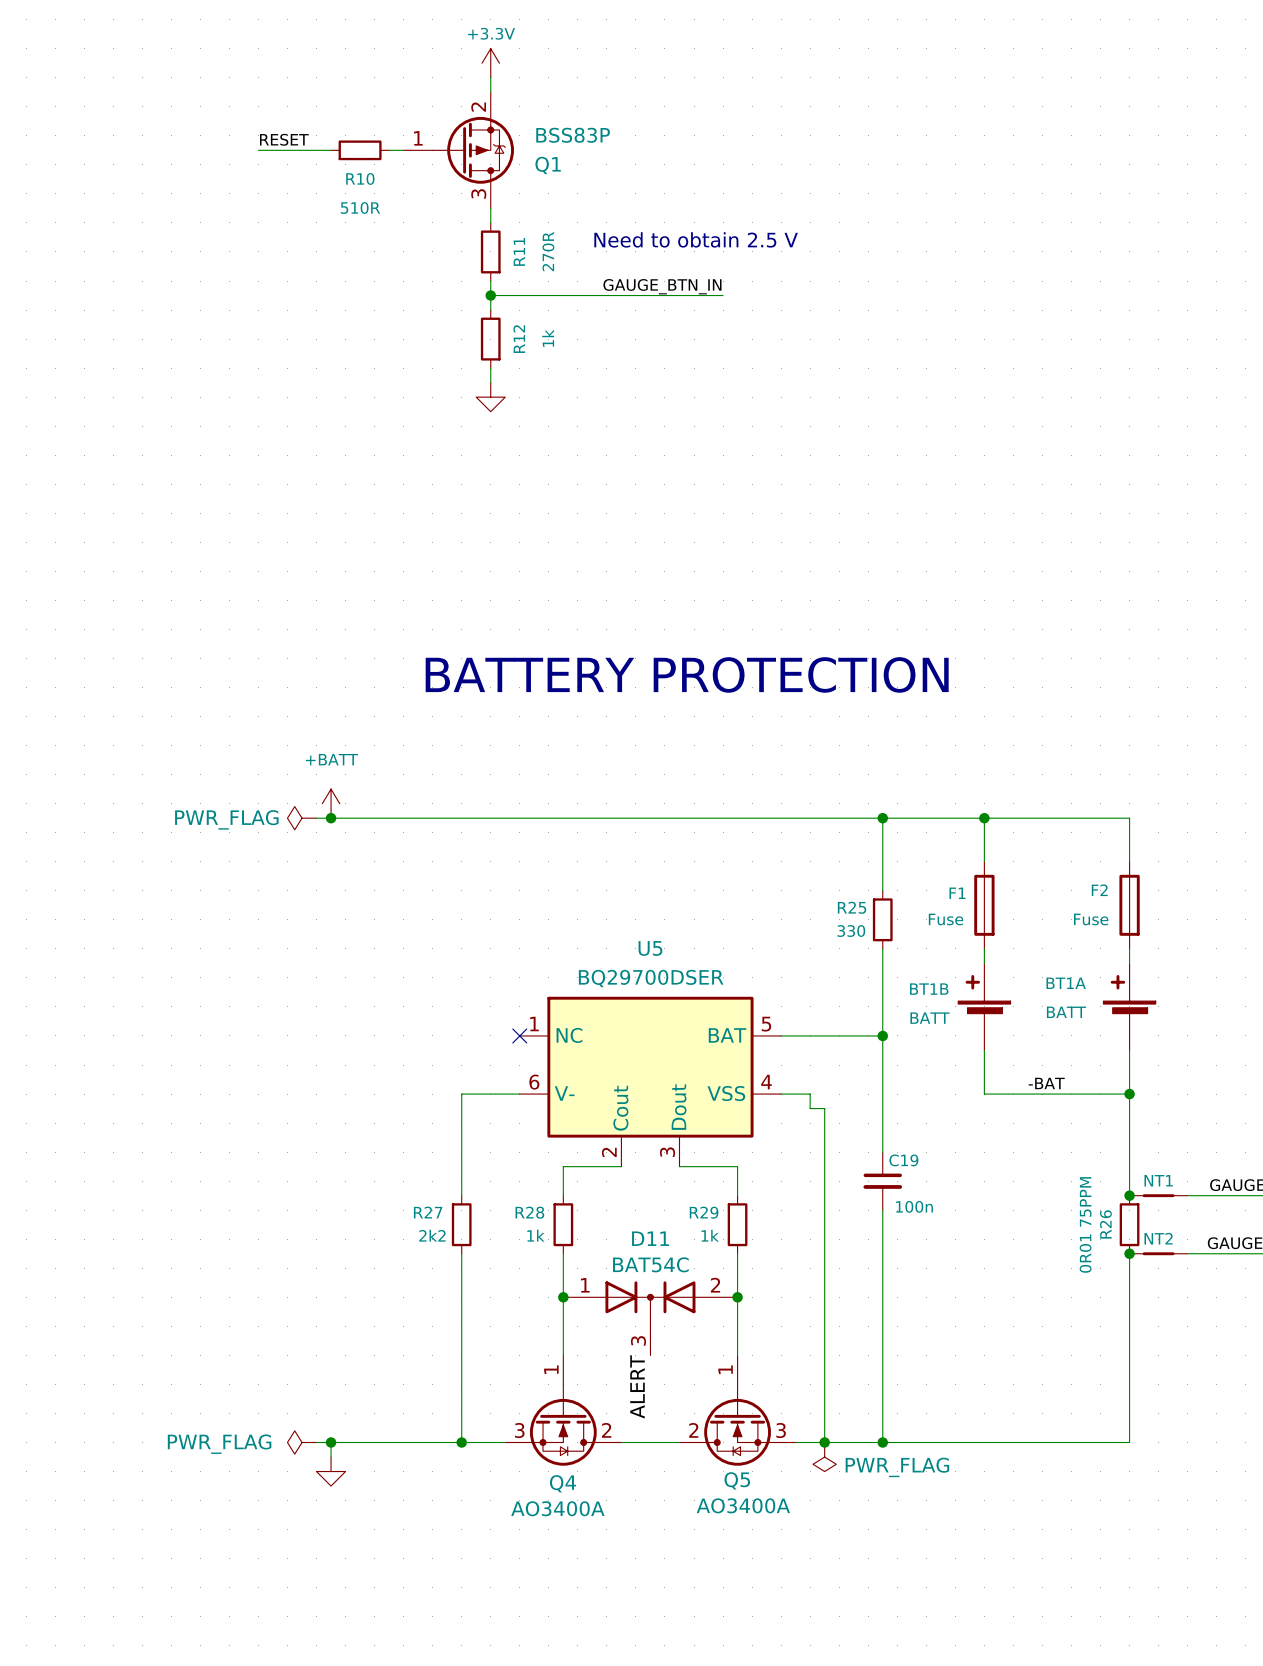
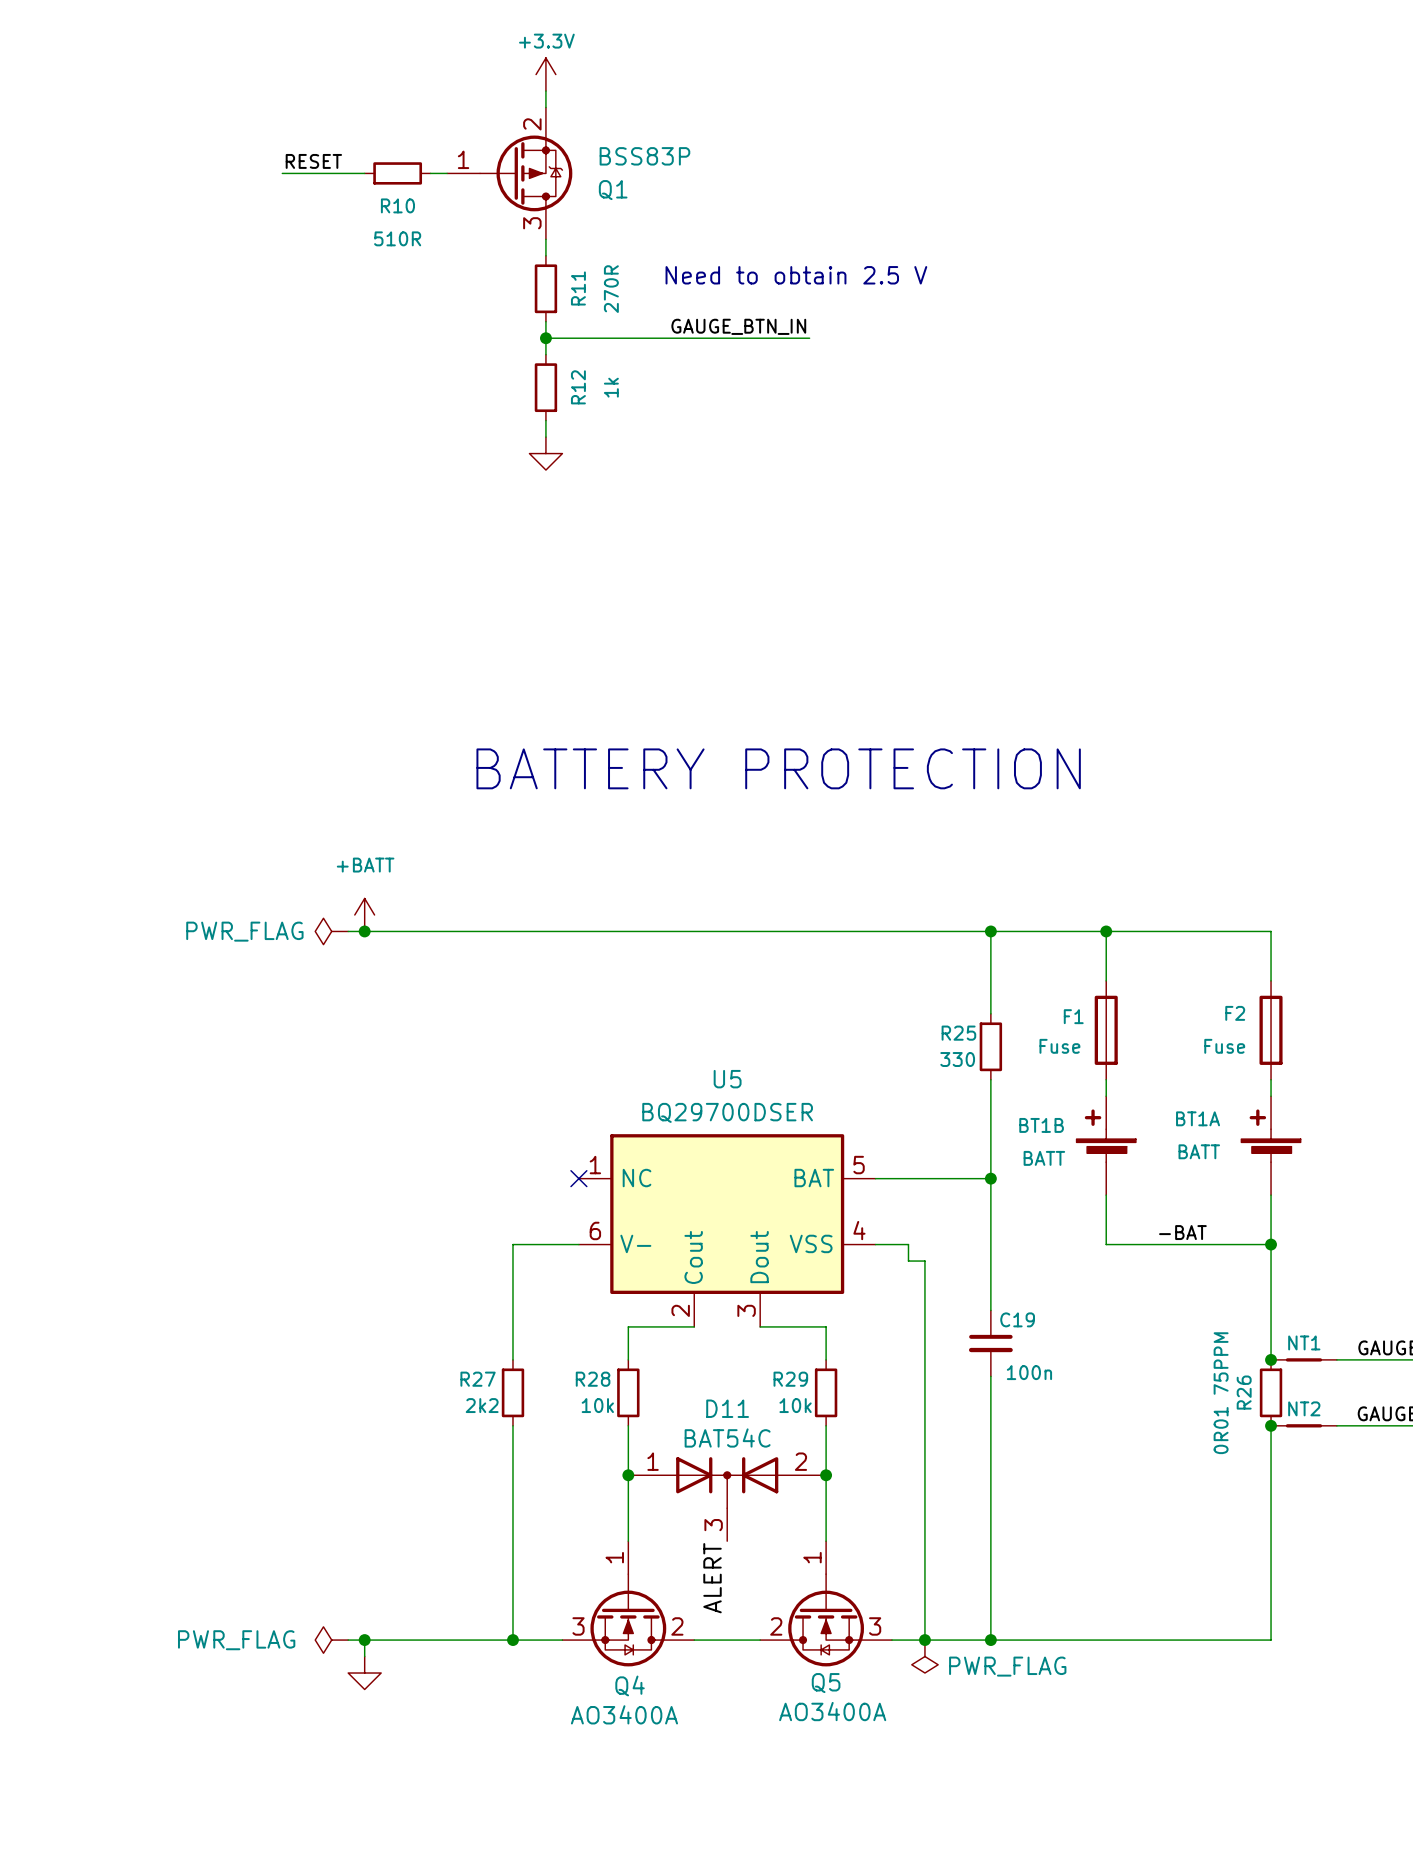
R28 value: 1k (535, 1235) -> 10k (597, 1405)
R29 value: 1k (710, 1235) -> 10k (795, 1405)

